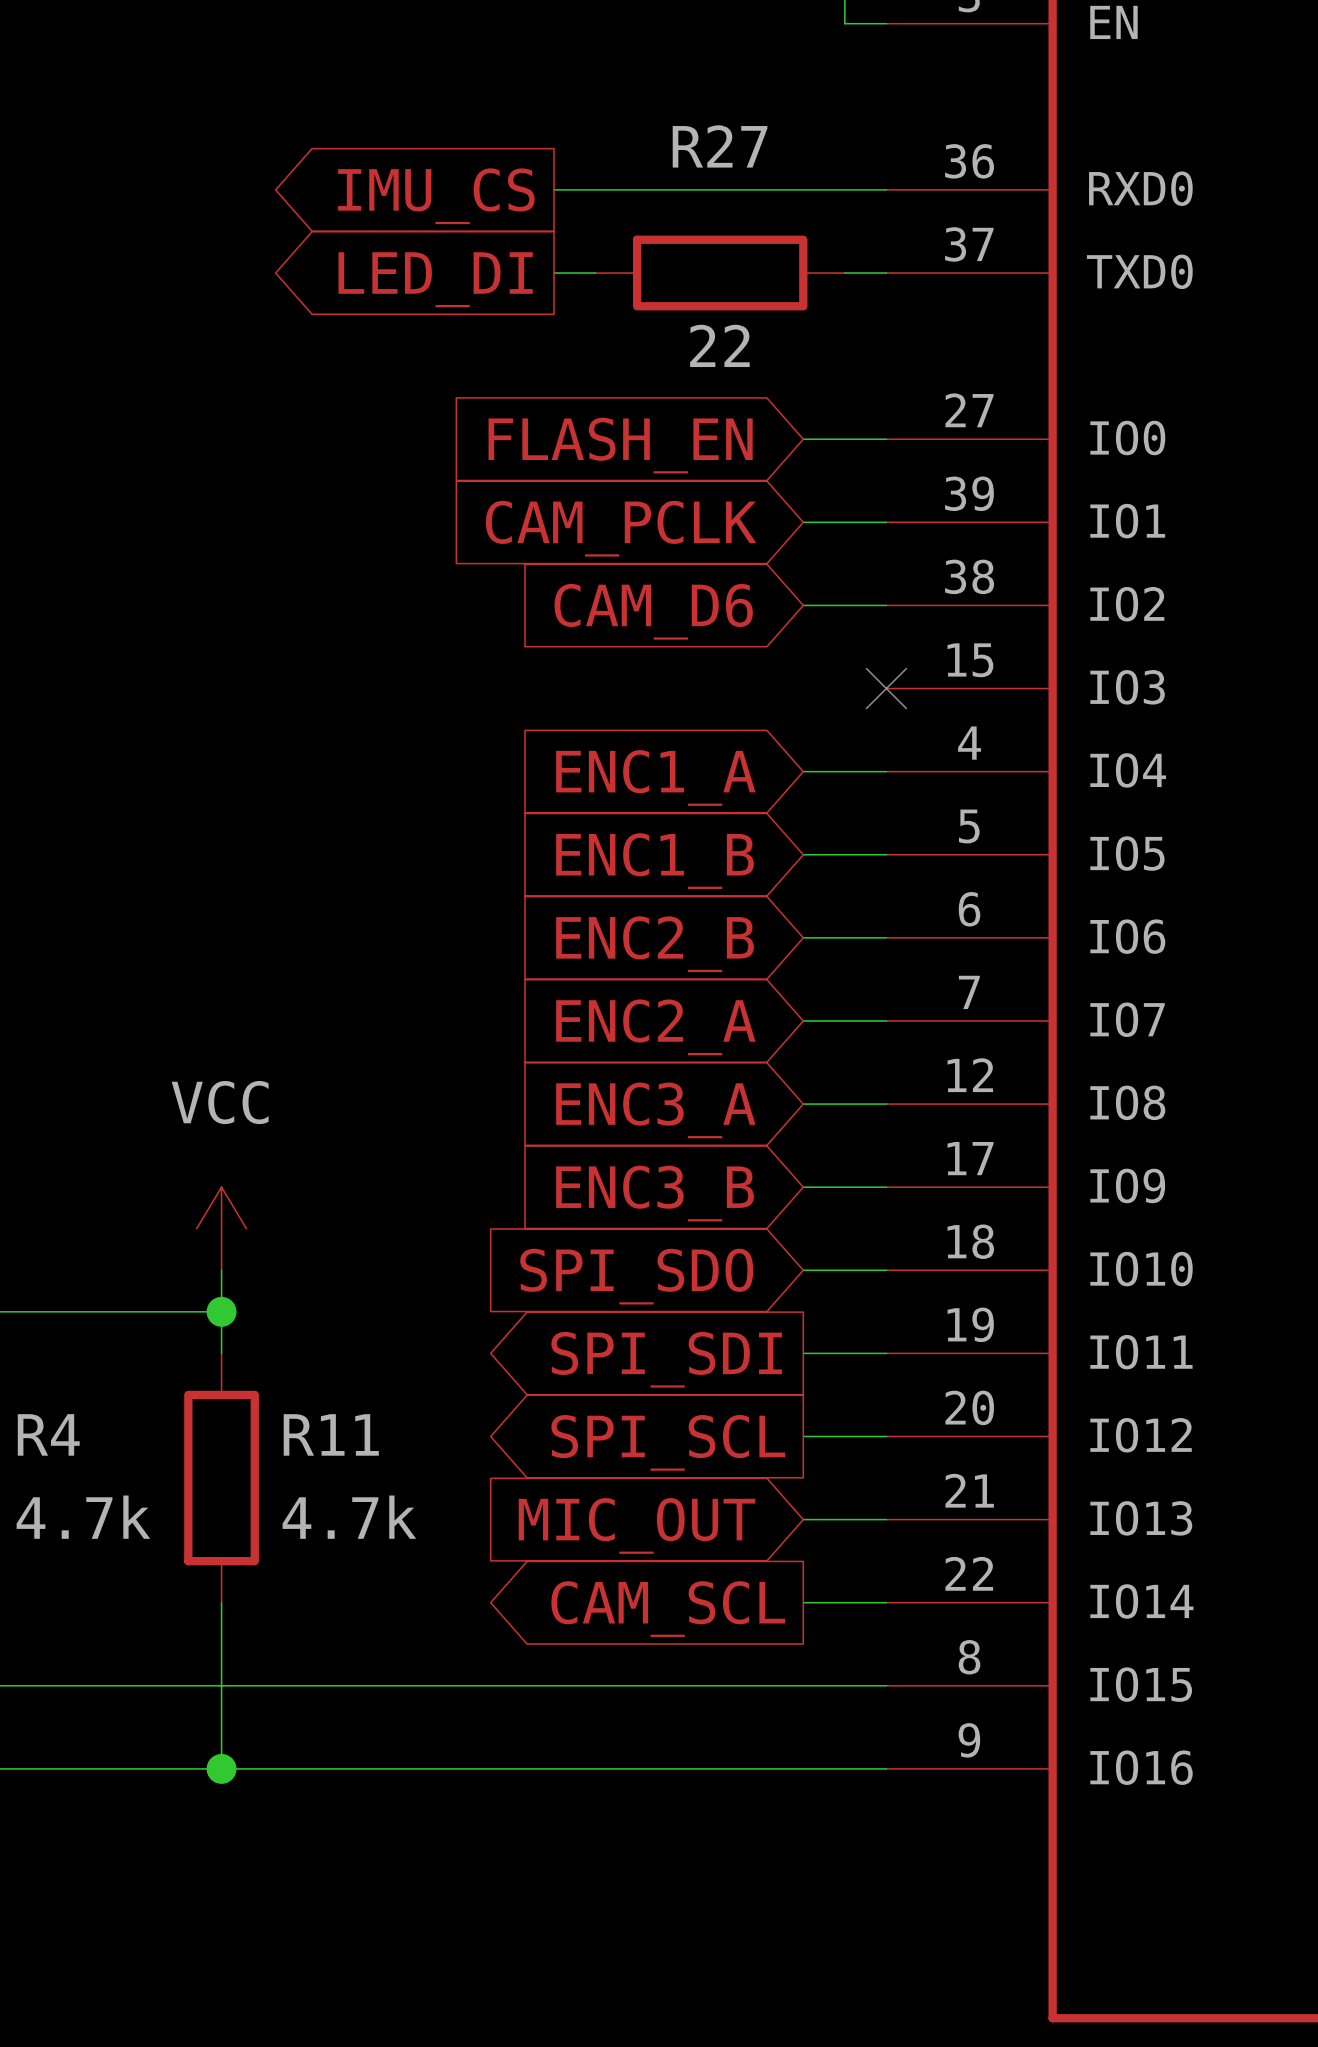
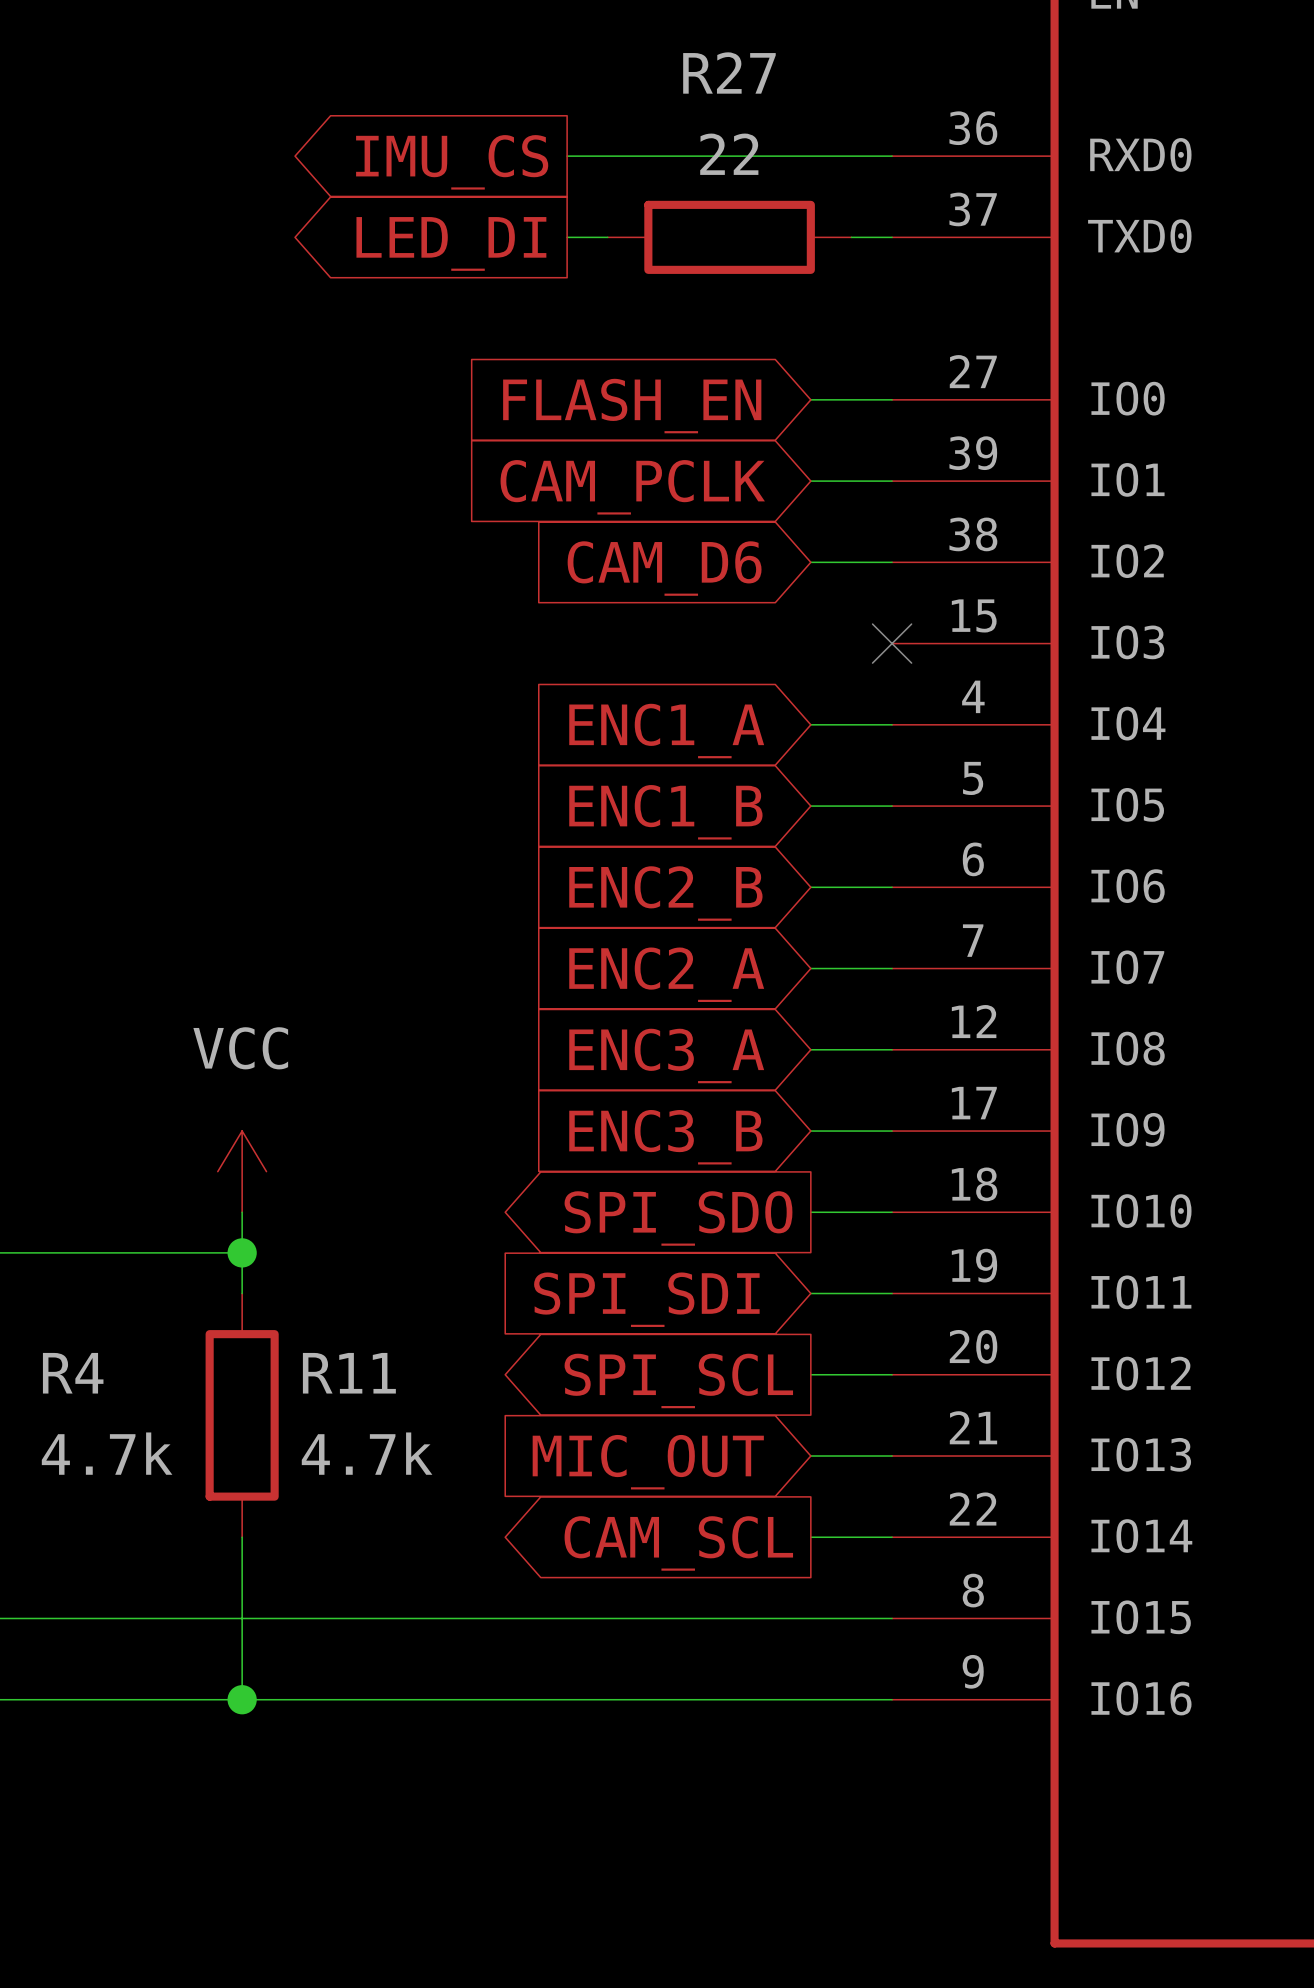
R27 name position: R27 (720, 146) -> R27 (729, 73)
R27 value position: 22 (719, 345) -> 22 (729, 154)
global label shape: input (636, 1276) -> output (678, 1218)
global label shape: output (666, 1359) -> input (646, 1299)

